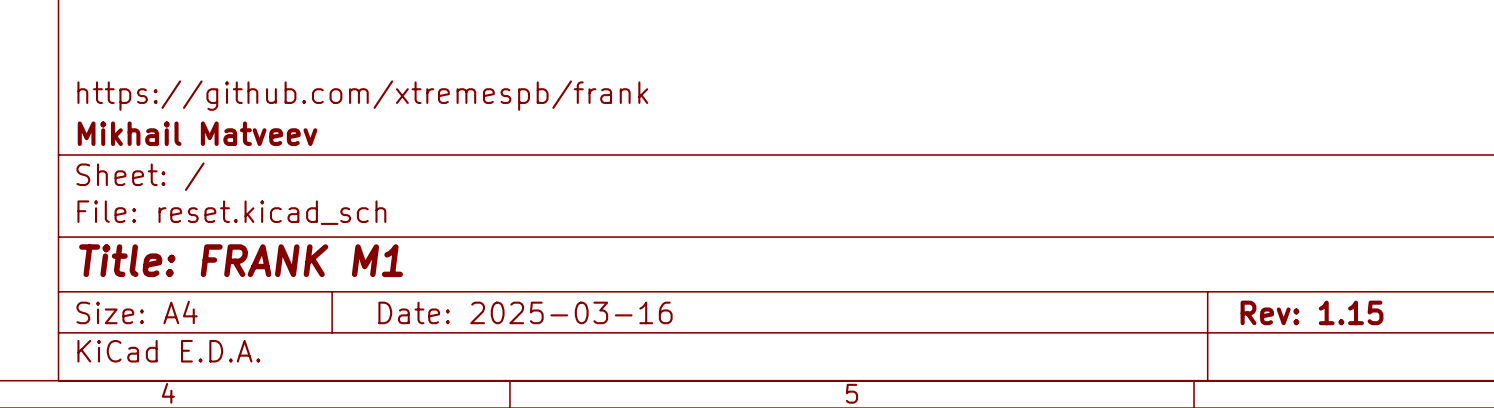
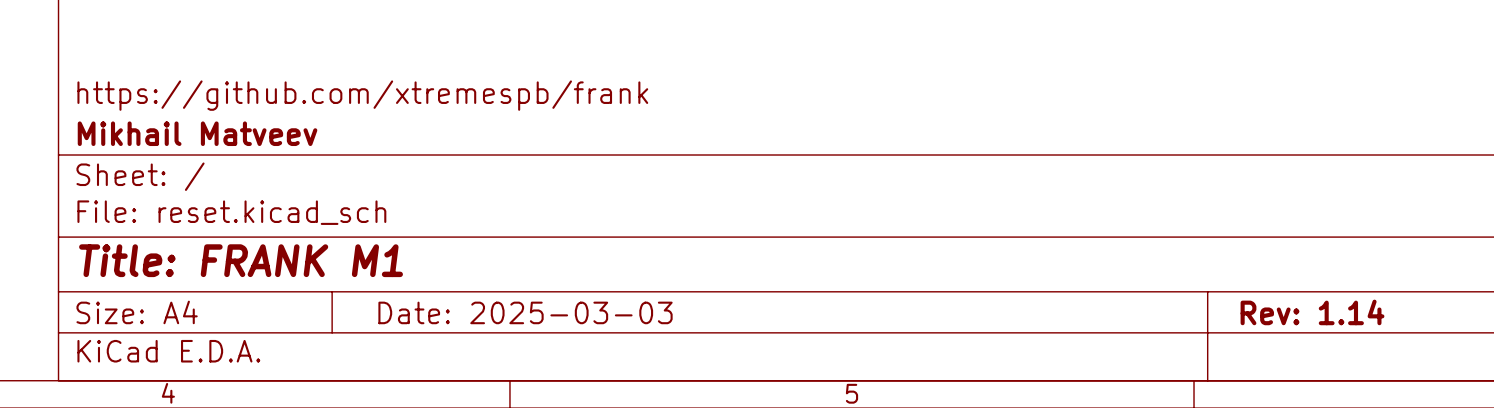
title block: Date: 2025-03-16 (525, 312) -> Date: 2025-03-03 (525, 312)
title block: Rev: 1.15 (1312, 312) -> Rev: 1.14 (1312, 312)

